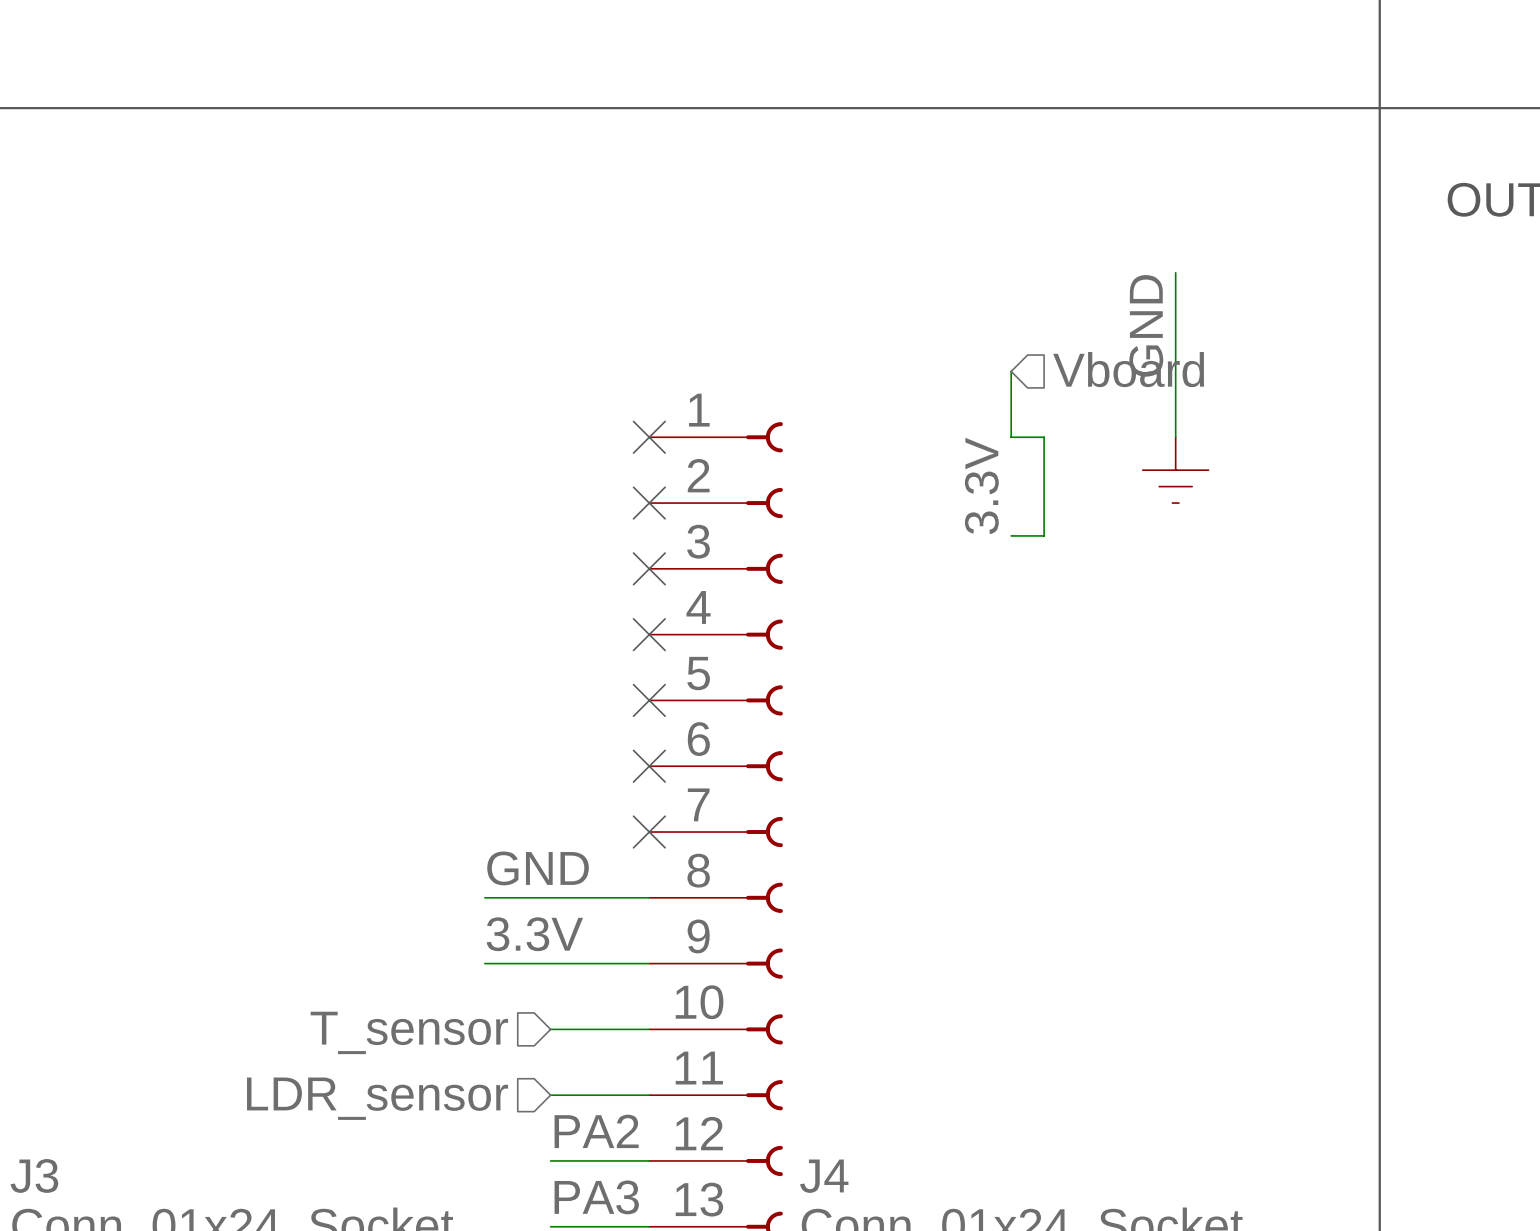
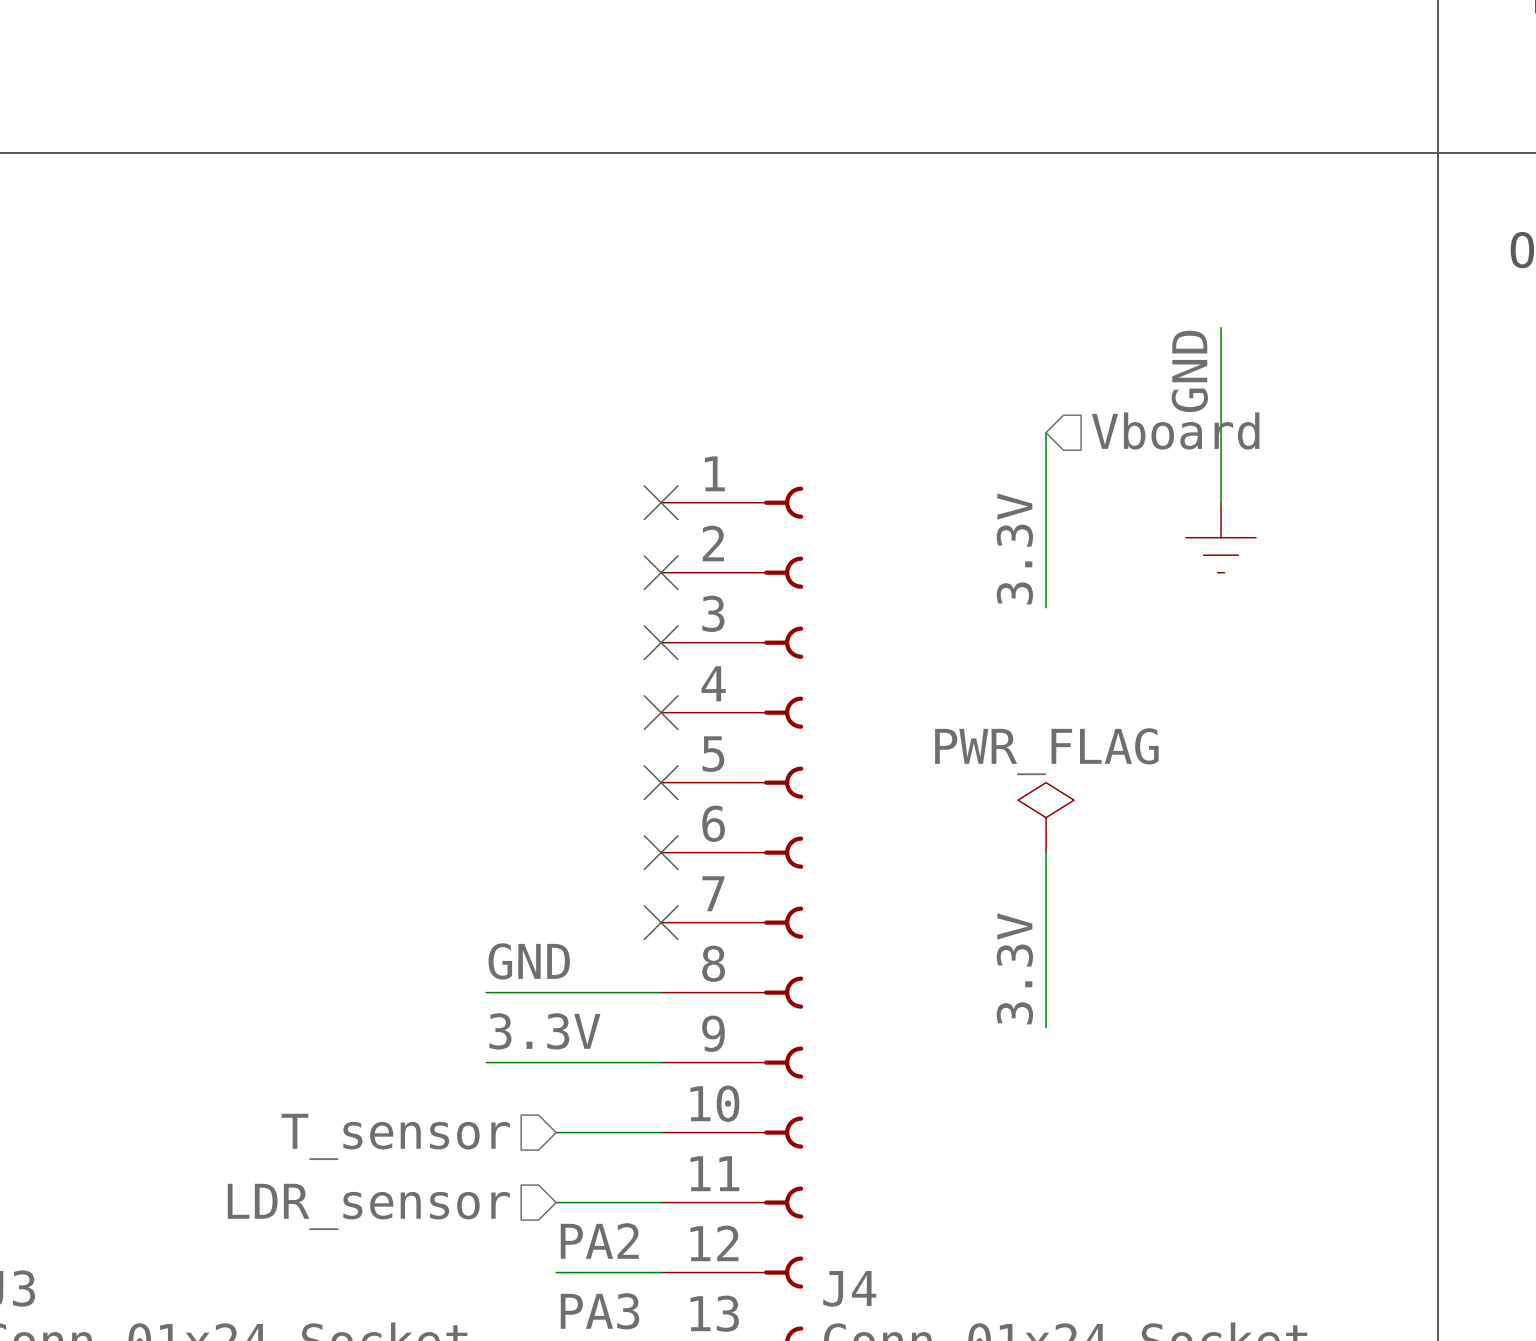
wire: (1011, 437) (1044, 437) (1044, 535) (1011, 535) -> (1046, 502) (1046, 607)
power symbol: none -> PWR_FLAG (1046, 817)
wire: none -> (1046, 852) (1046, 1027)
label: none -> 3.3V (1014, 968)

